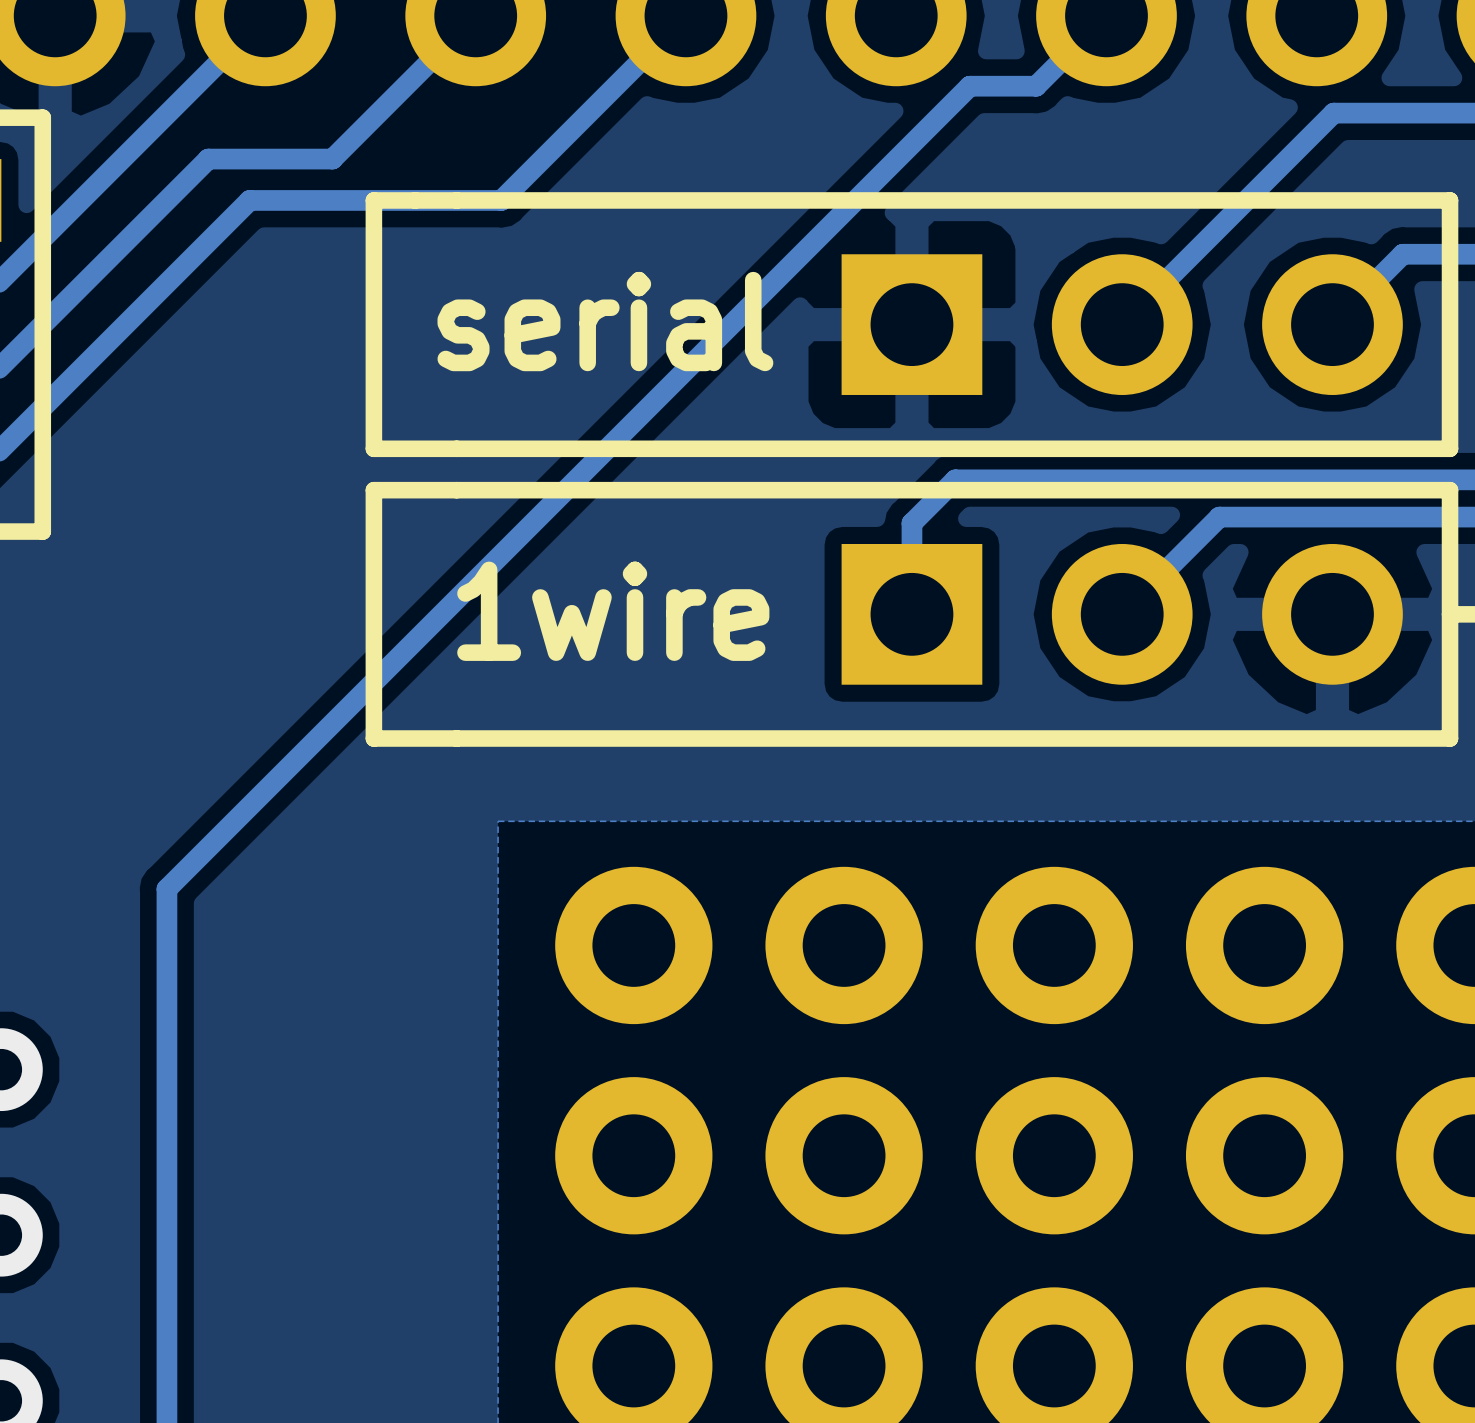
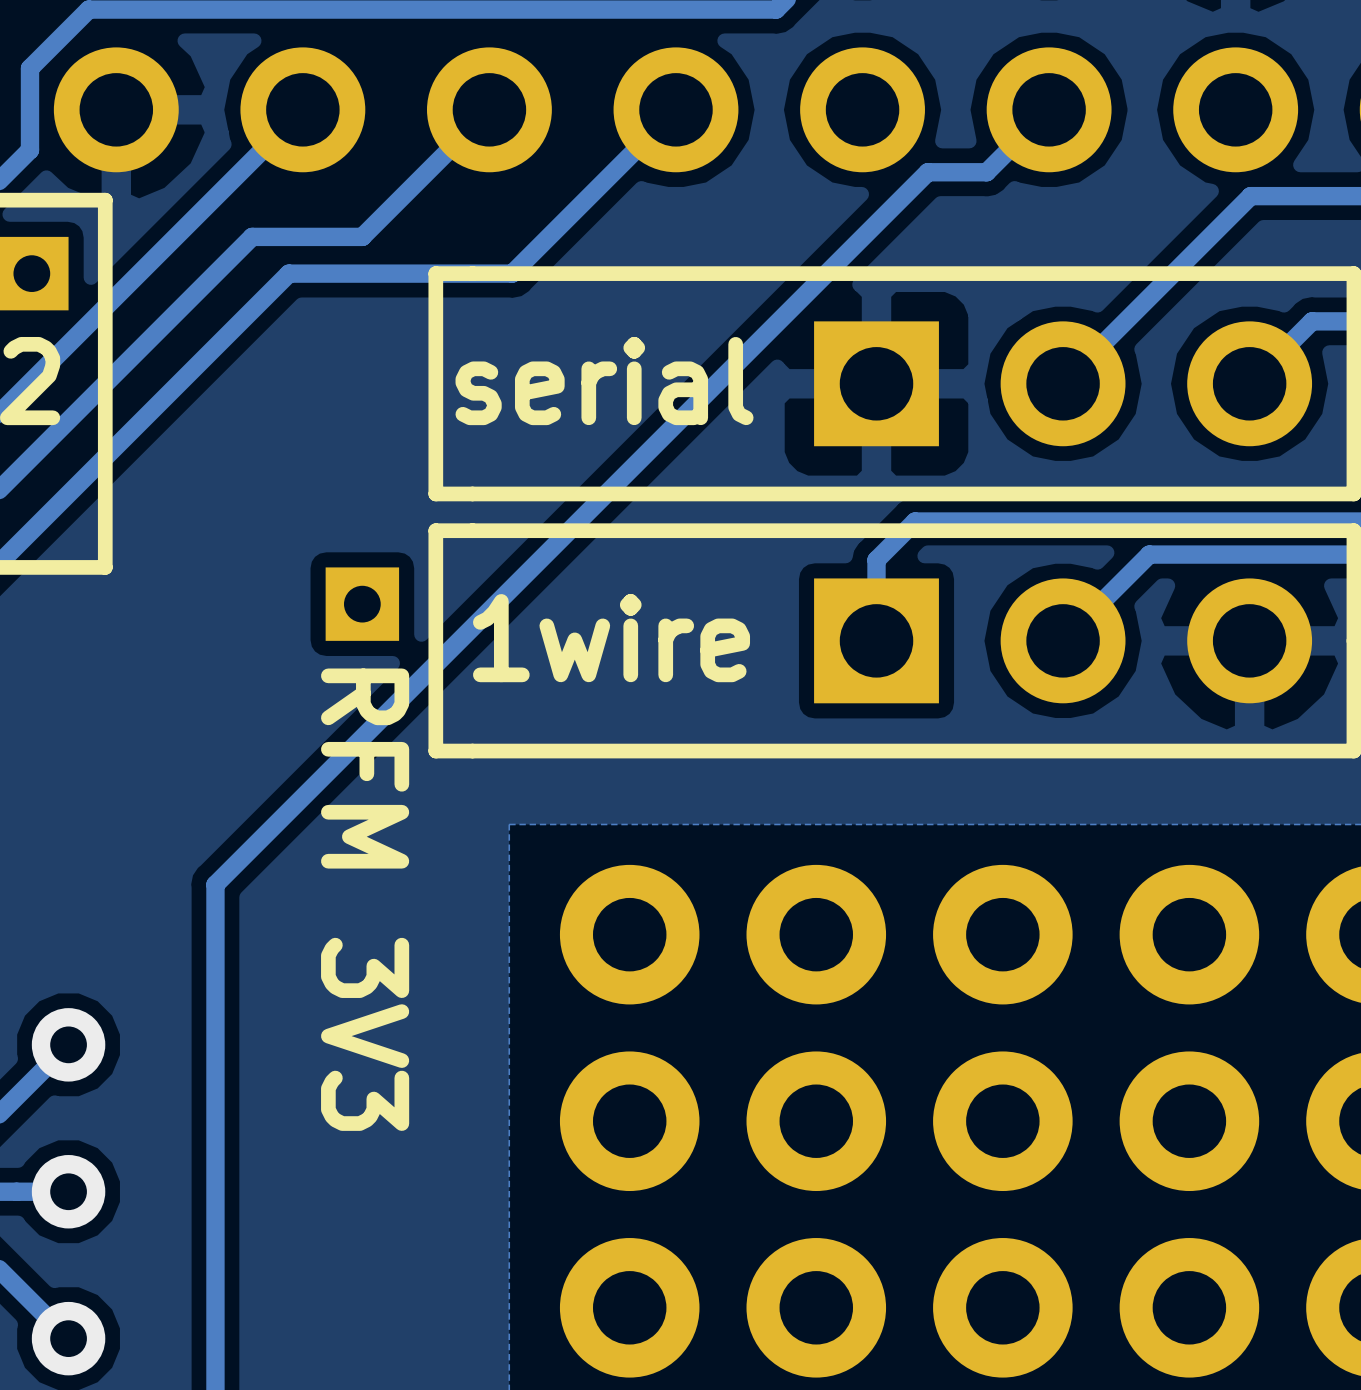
line: (415, 200) (373, 200) (373, 448) (415, 448) -> (435, 273) (435, 493)
line: (415, 490) (373, 490) (373, 738) (415, 738) -> (435, 530) (435, 751)
part: none -> (362, 604)
text: none -> RFM 3V3 (365, 899)

